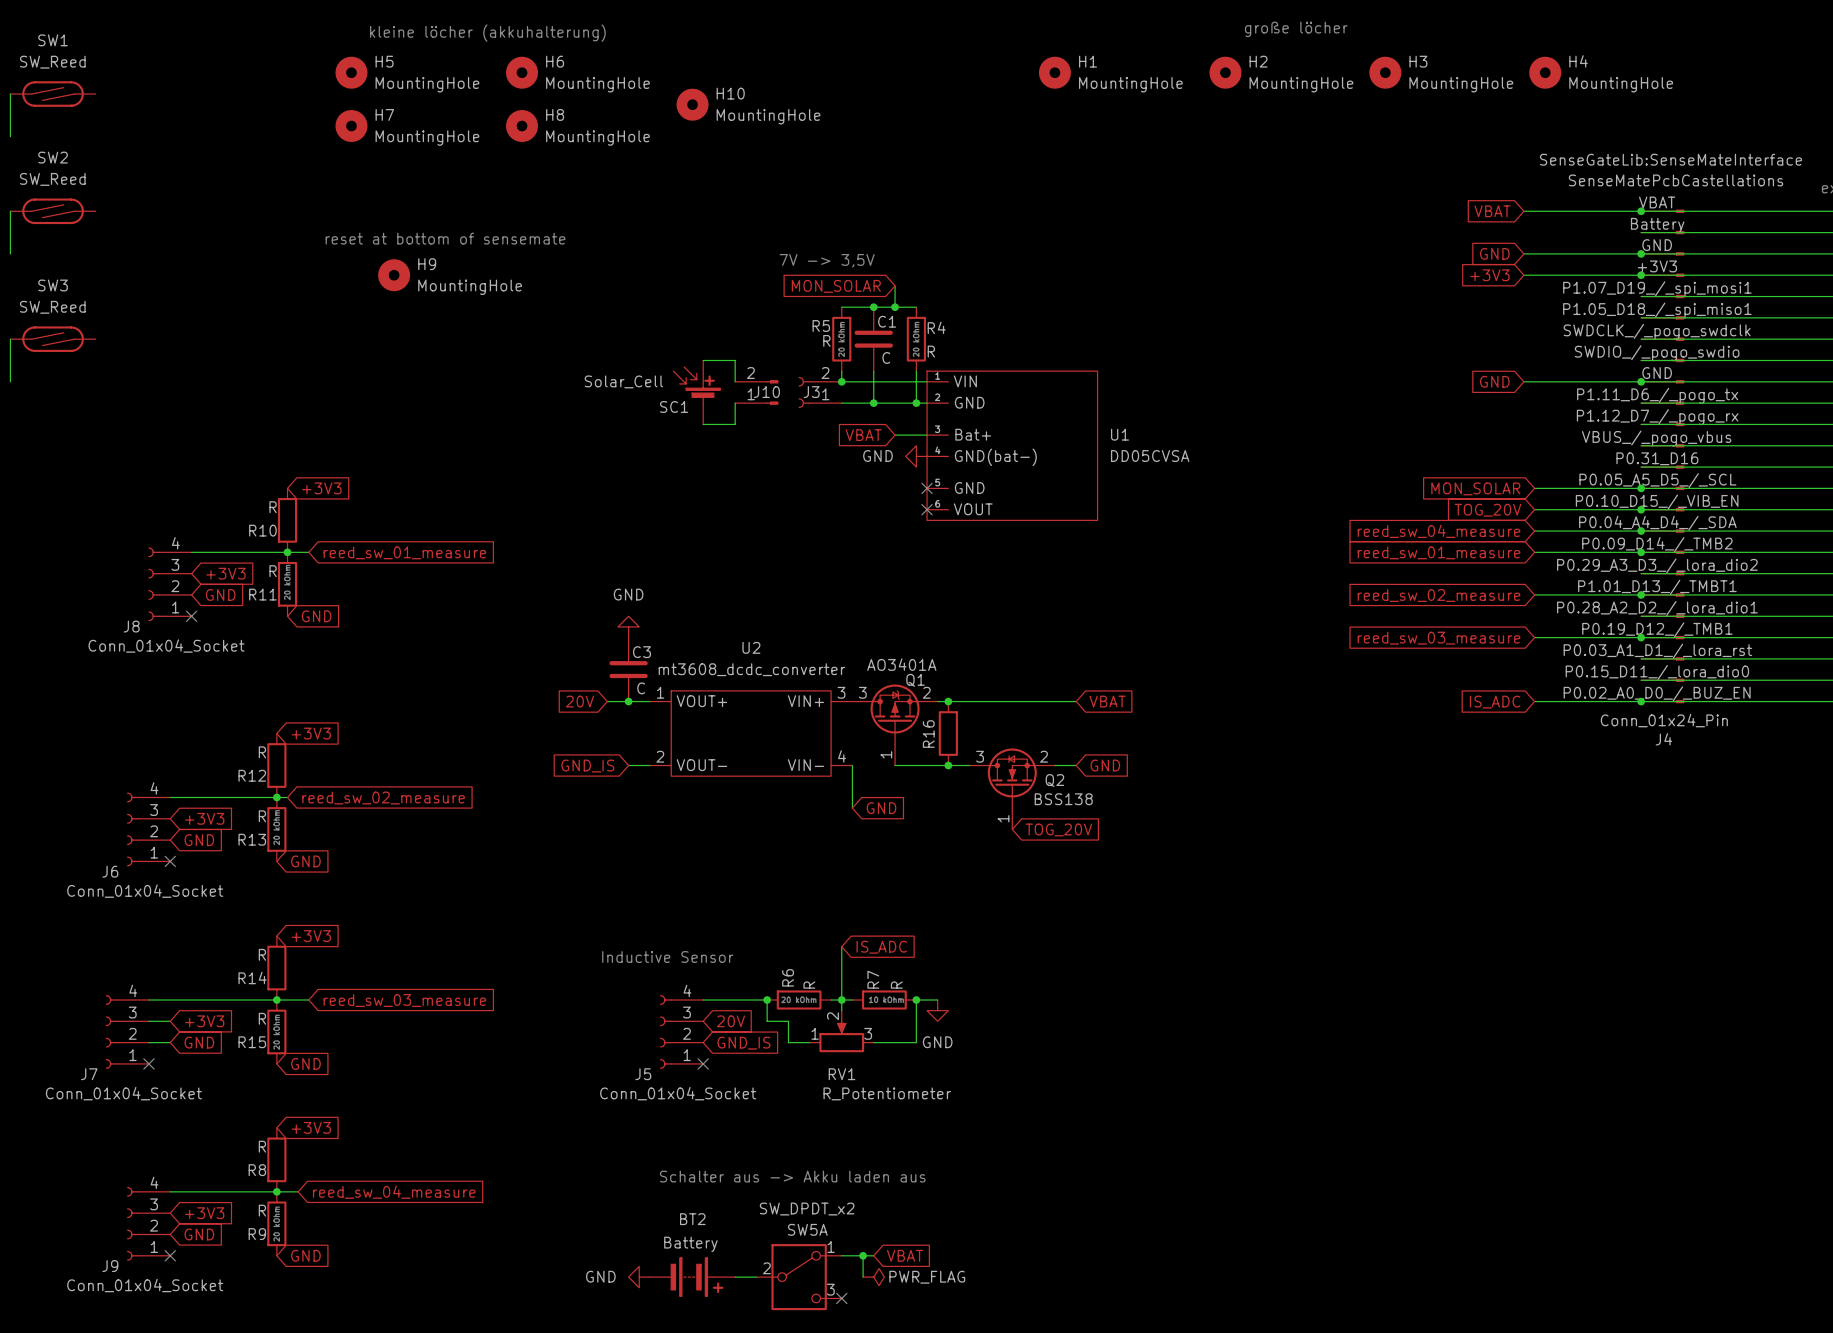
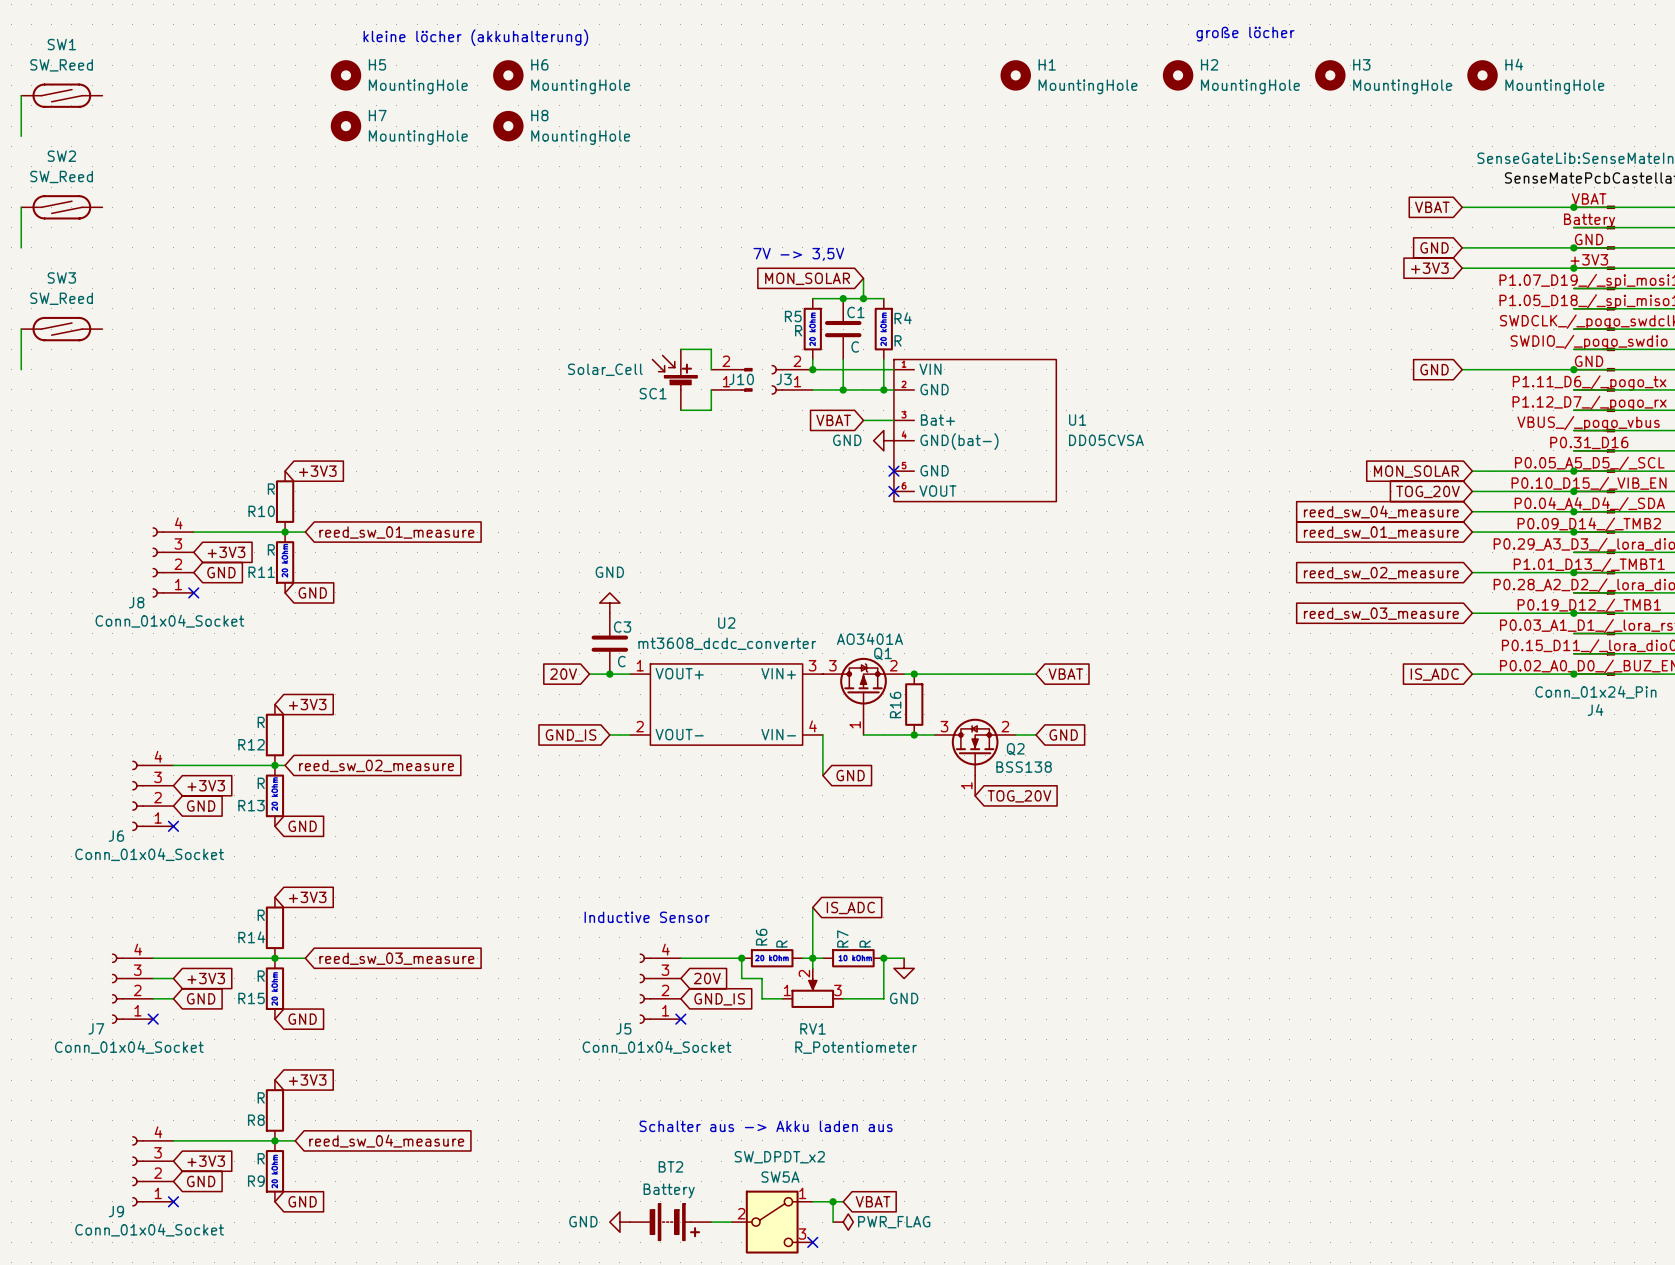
H10: MountingHole (692, 104) -> none
text: reset at bottom of sensemate (445, 238) -> none
H9: MountingHole (394, 275) -> none

